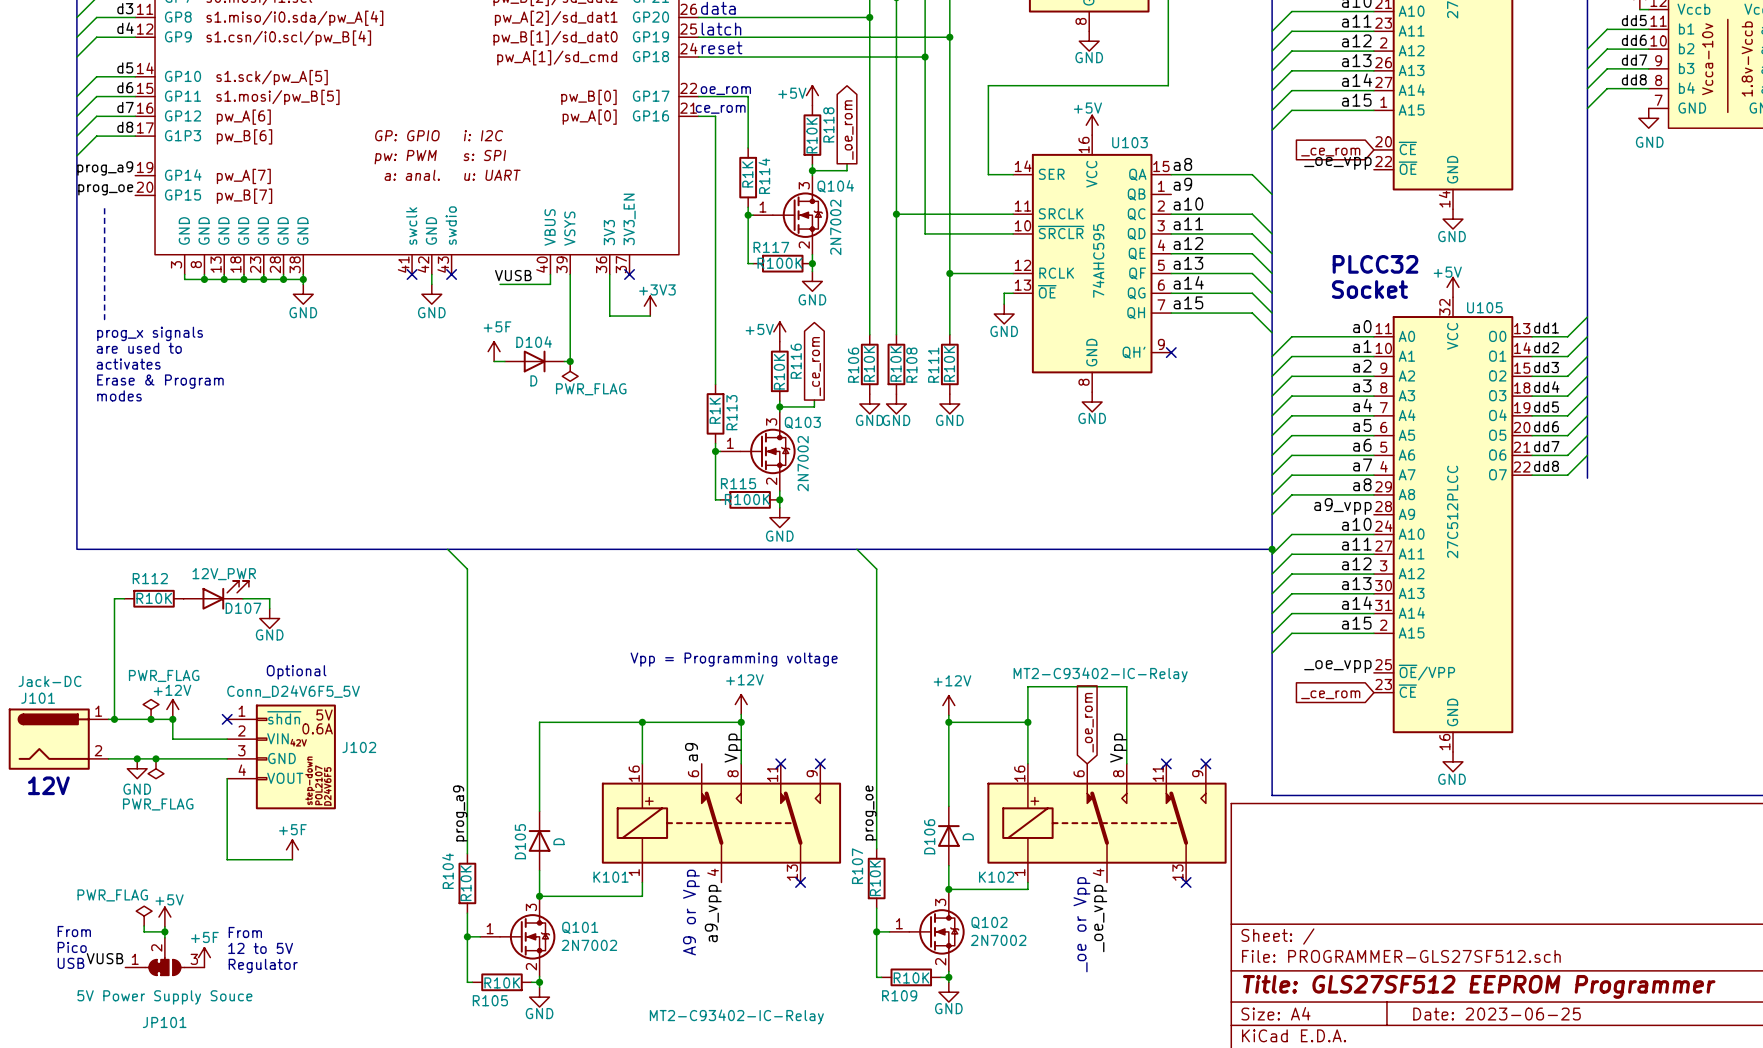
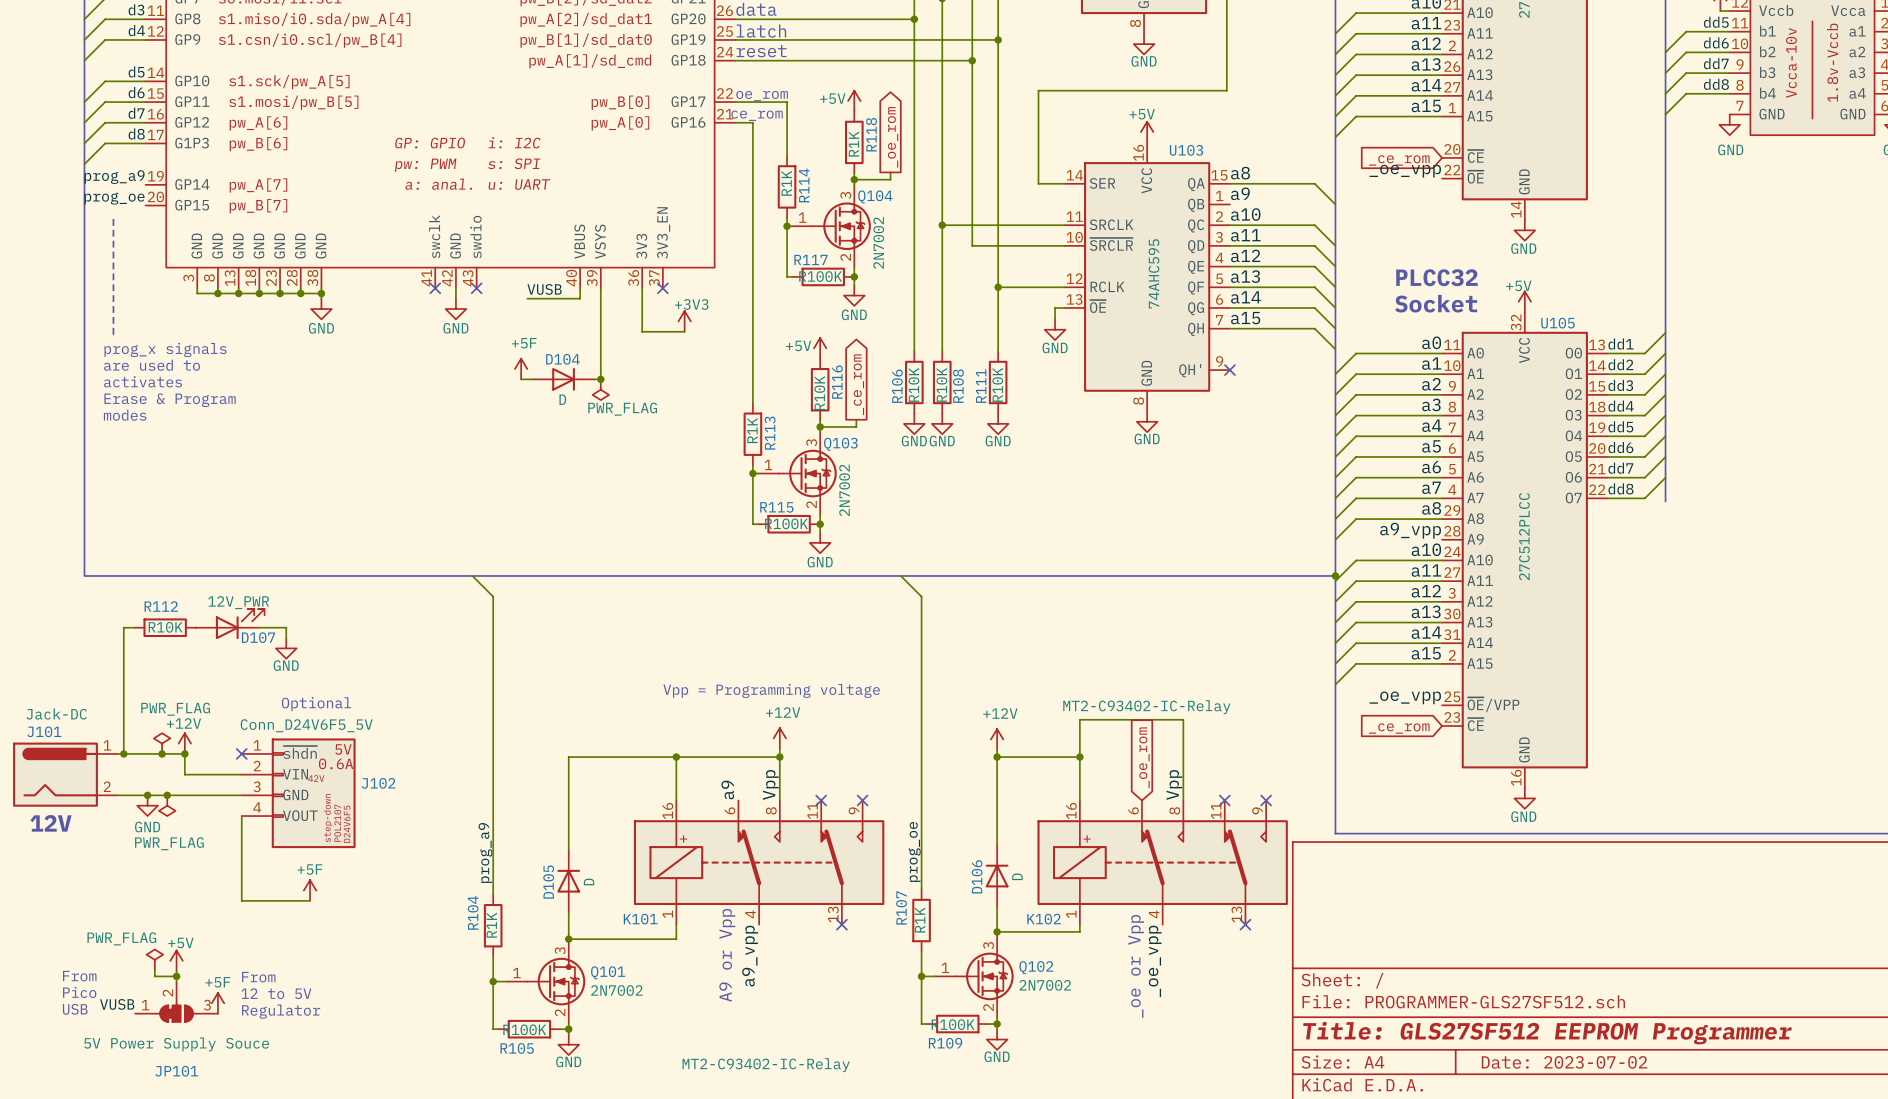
R118 value: R10K (812, 135) -> R1K (853, 144)
R107 value: R10K (875, 878) -> R1K (920, 920)
R104 value: R10K (466, 883) -> R1K (491, 925)
R109 value: R10K (911, 977) -> R100K (953, 1024)
R105 value: R10K (502, 982) -> R100K (524, 1029)
title block: Date: 2023-06-25 (1497, 1014) -> Date: 2023-07-02 (1564, 1062)

